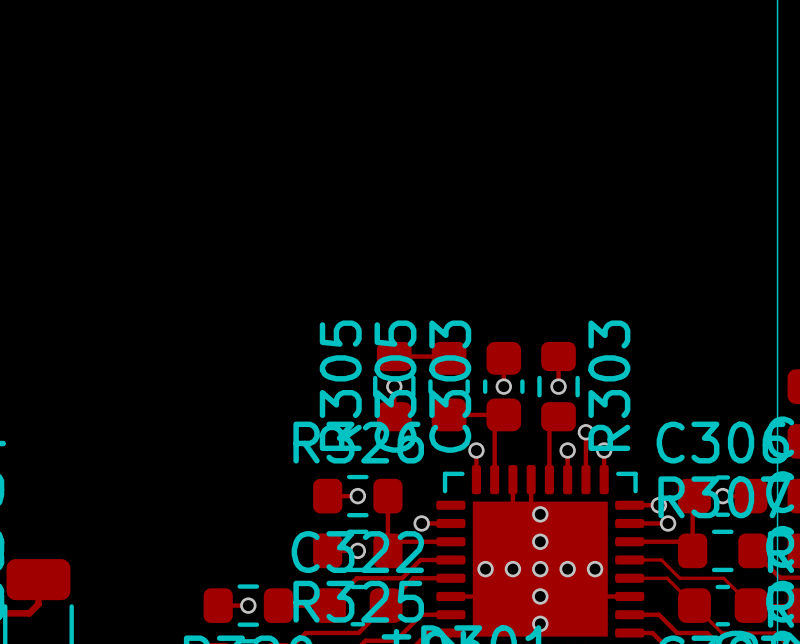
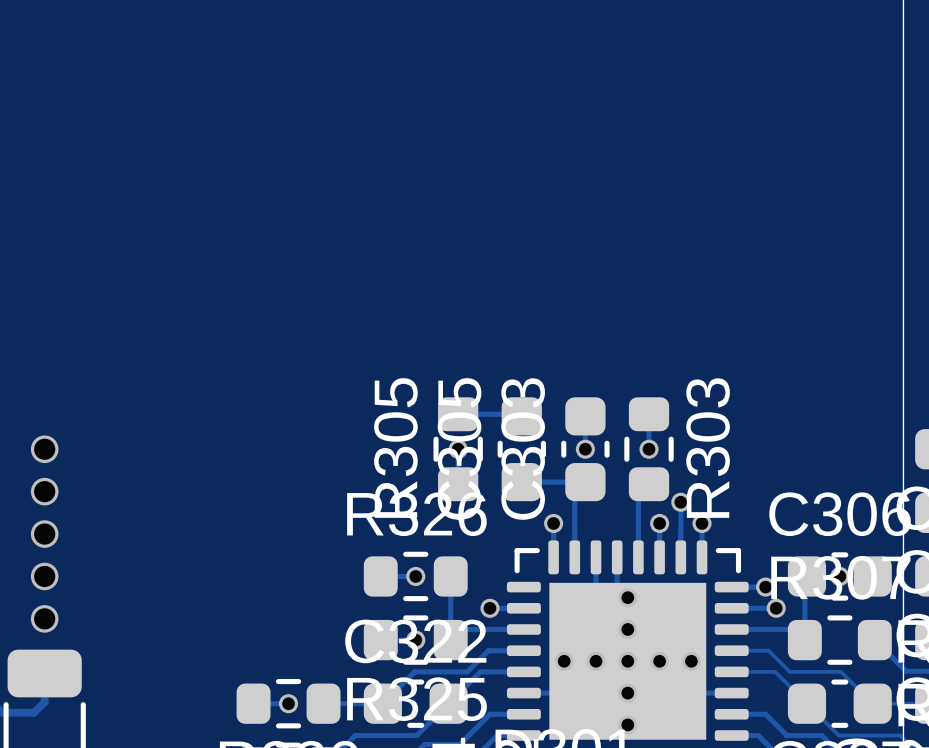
via: none -> (44, 449)
via: none -> (44, 491)
via: none -> (44, 534)
via: none -> (44, 576)
via: none -> (44, 618)

